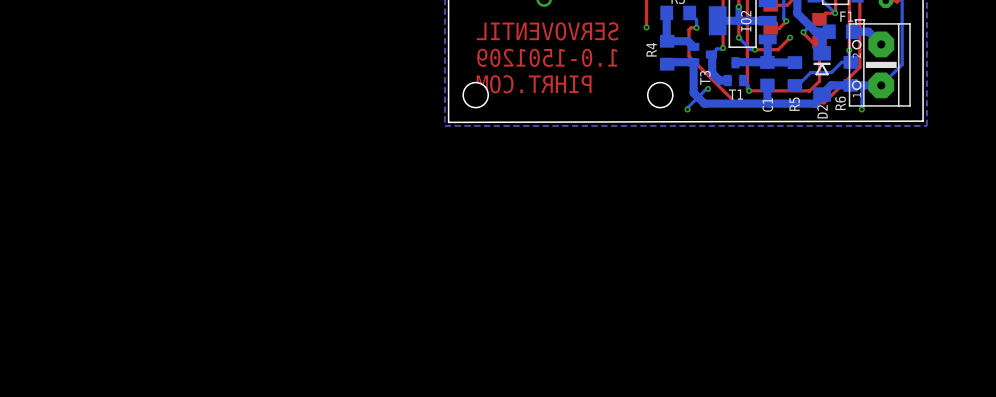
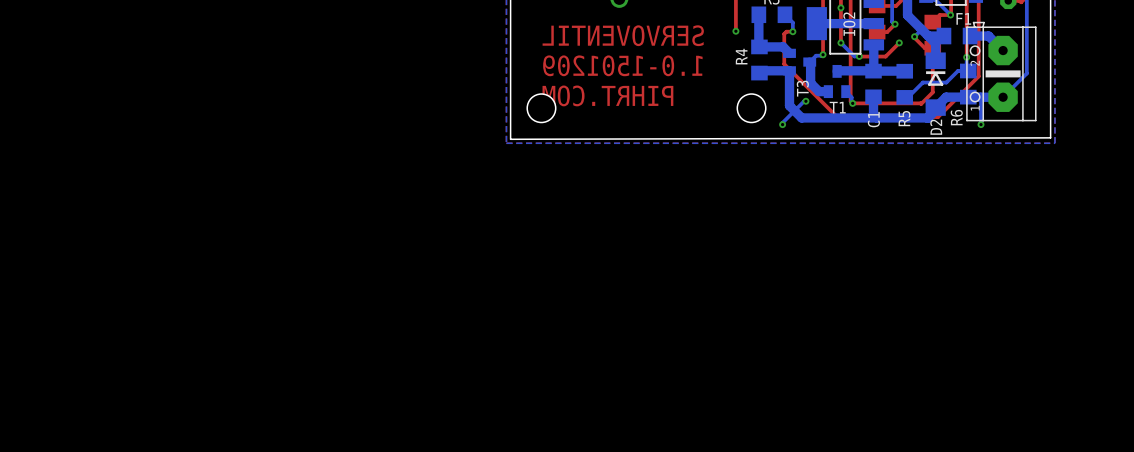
bottom track: (738, 6) (738, 20) -> none

